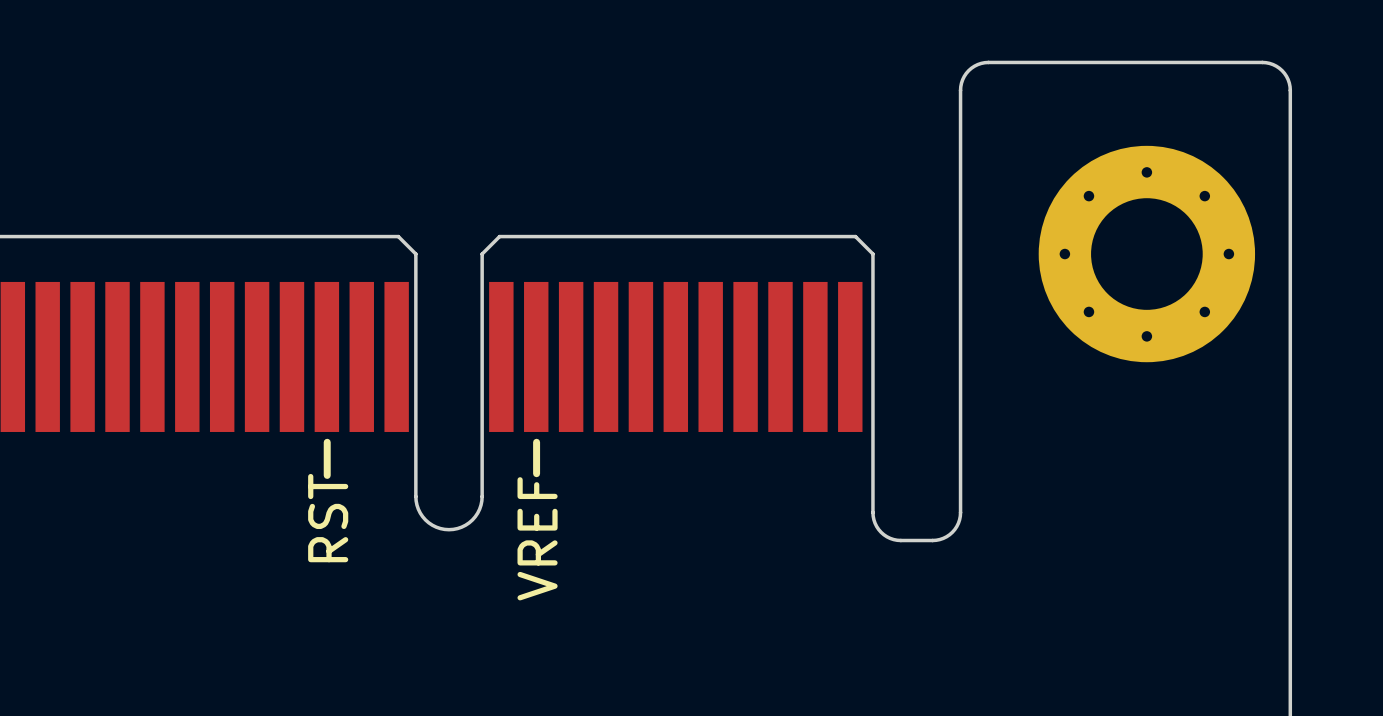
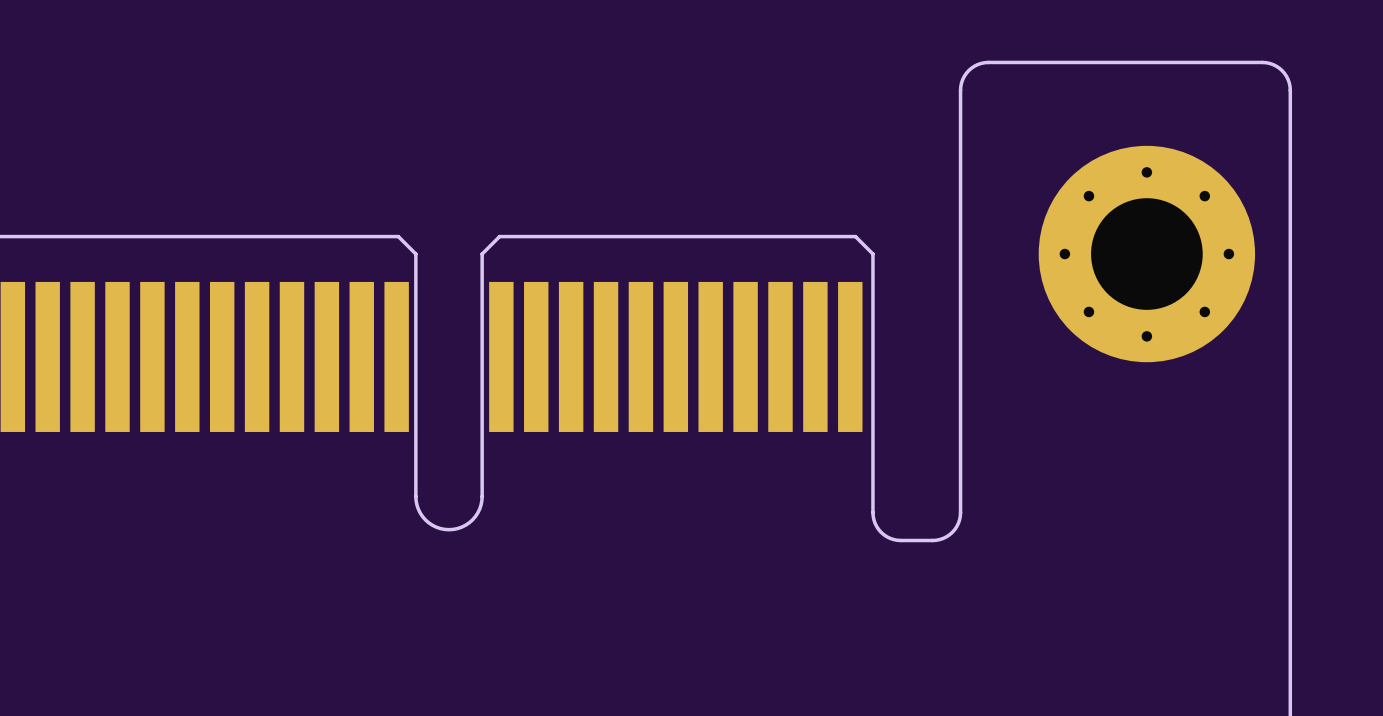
line: (327, 442) (327, 475) -> none
line: (536, 442) (536, 473) -> none
text: RST (328, 518) -> none
text: VREF (537, 538) -> none

